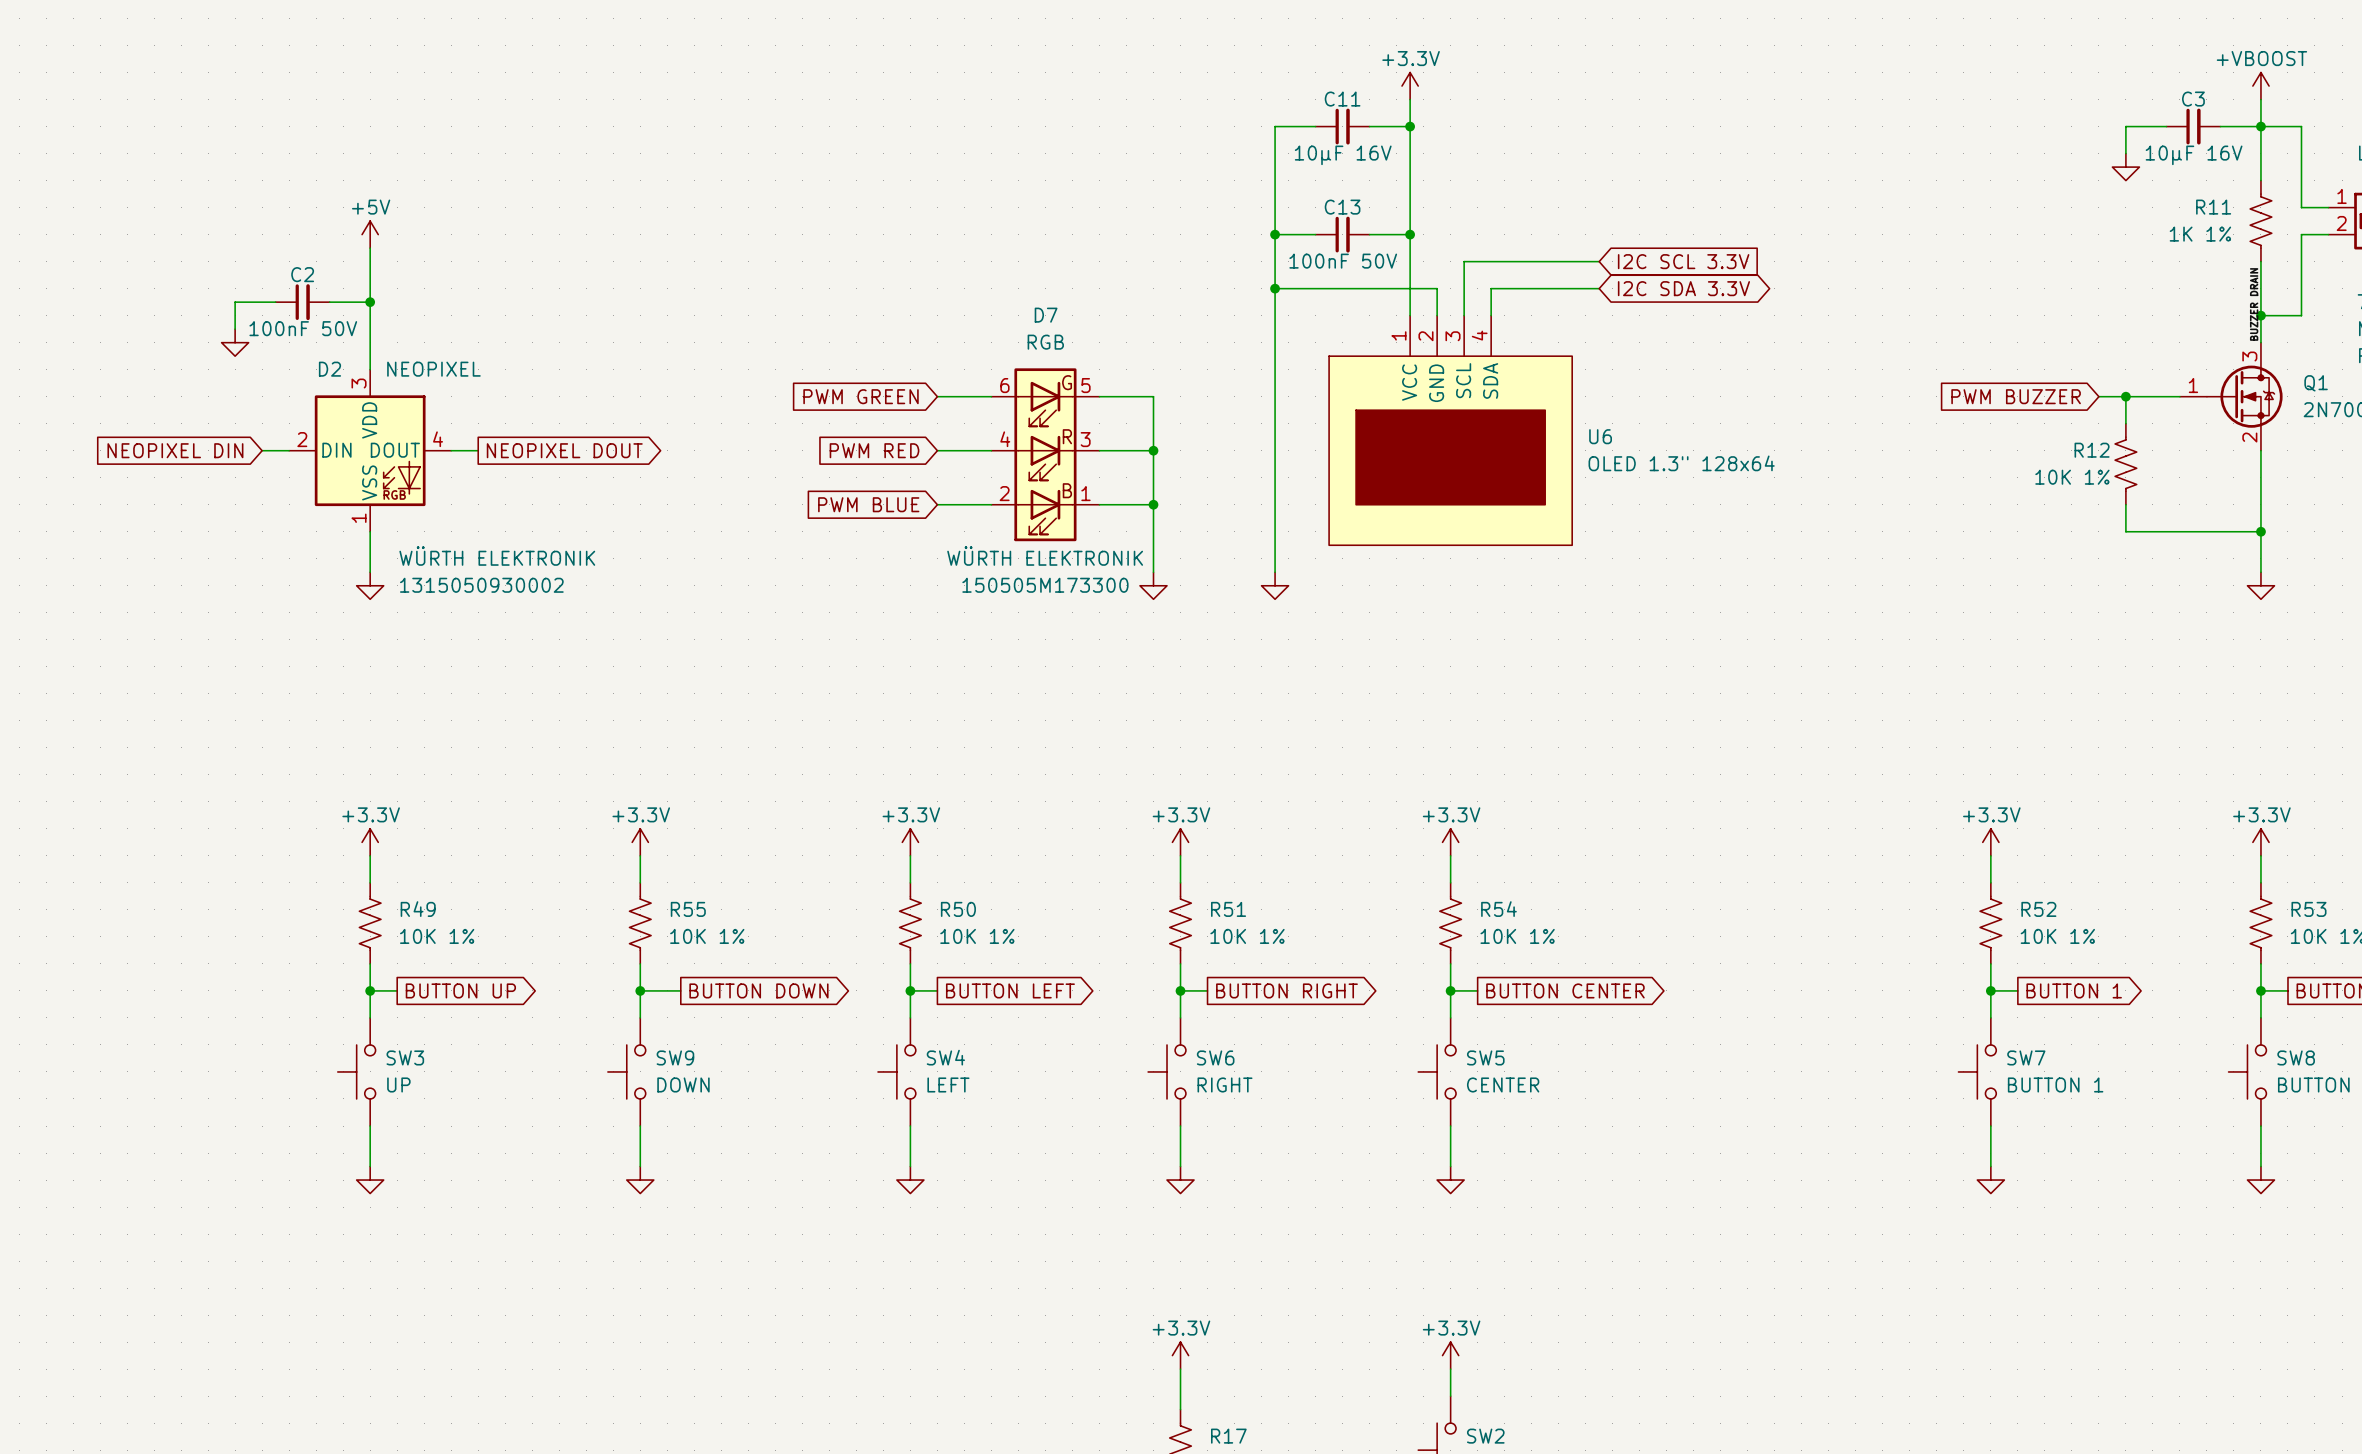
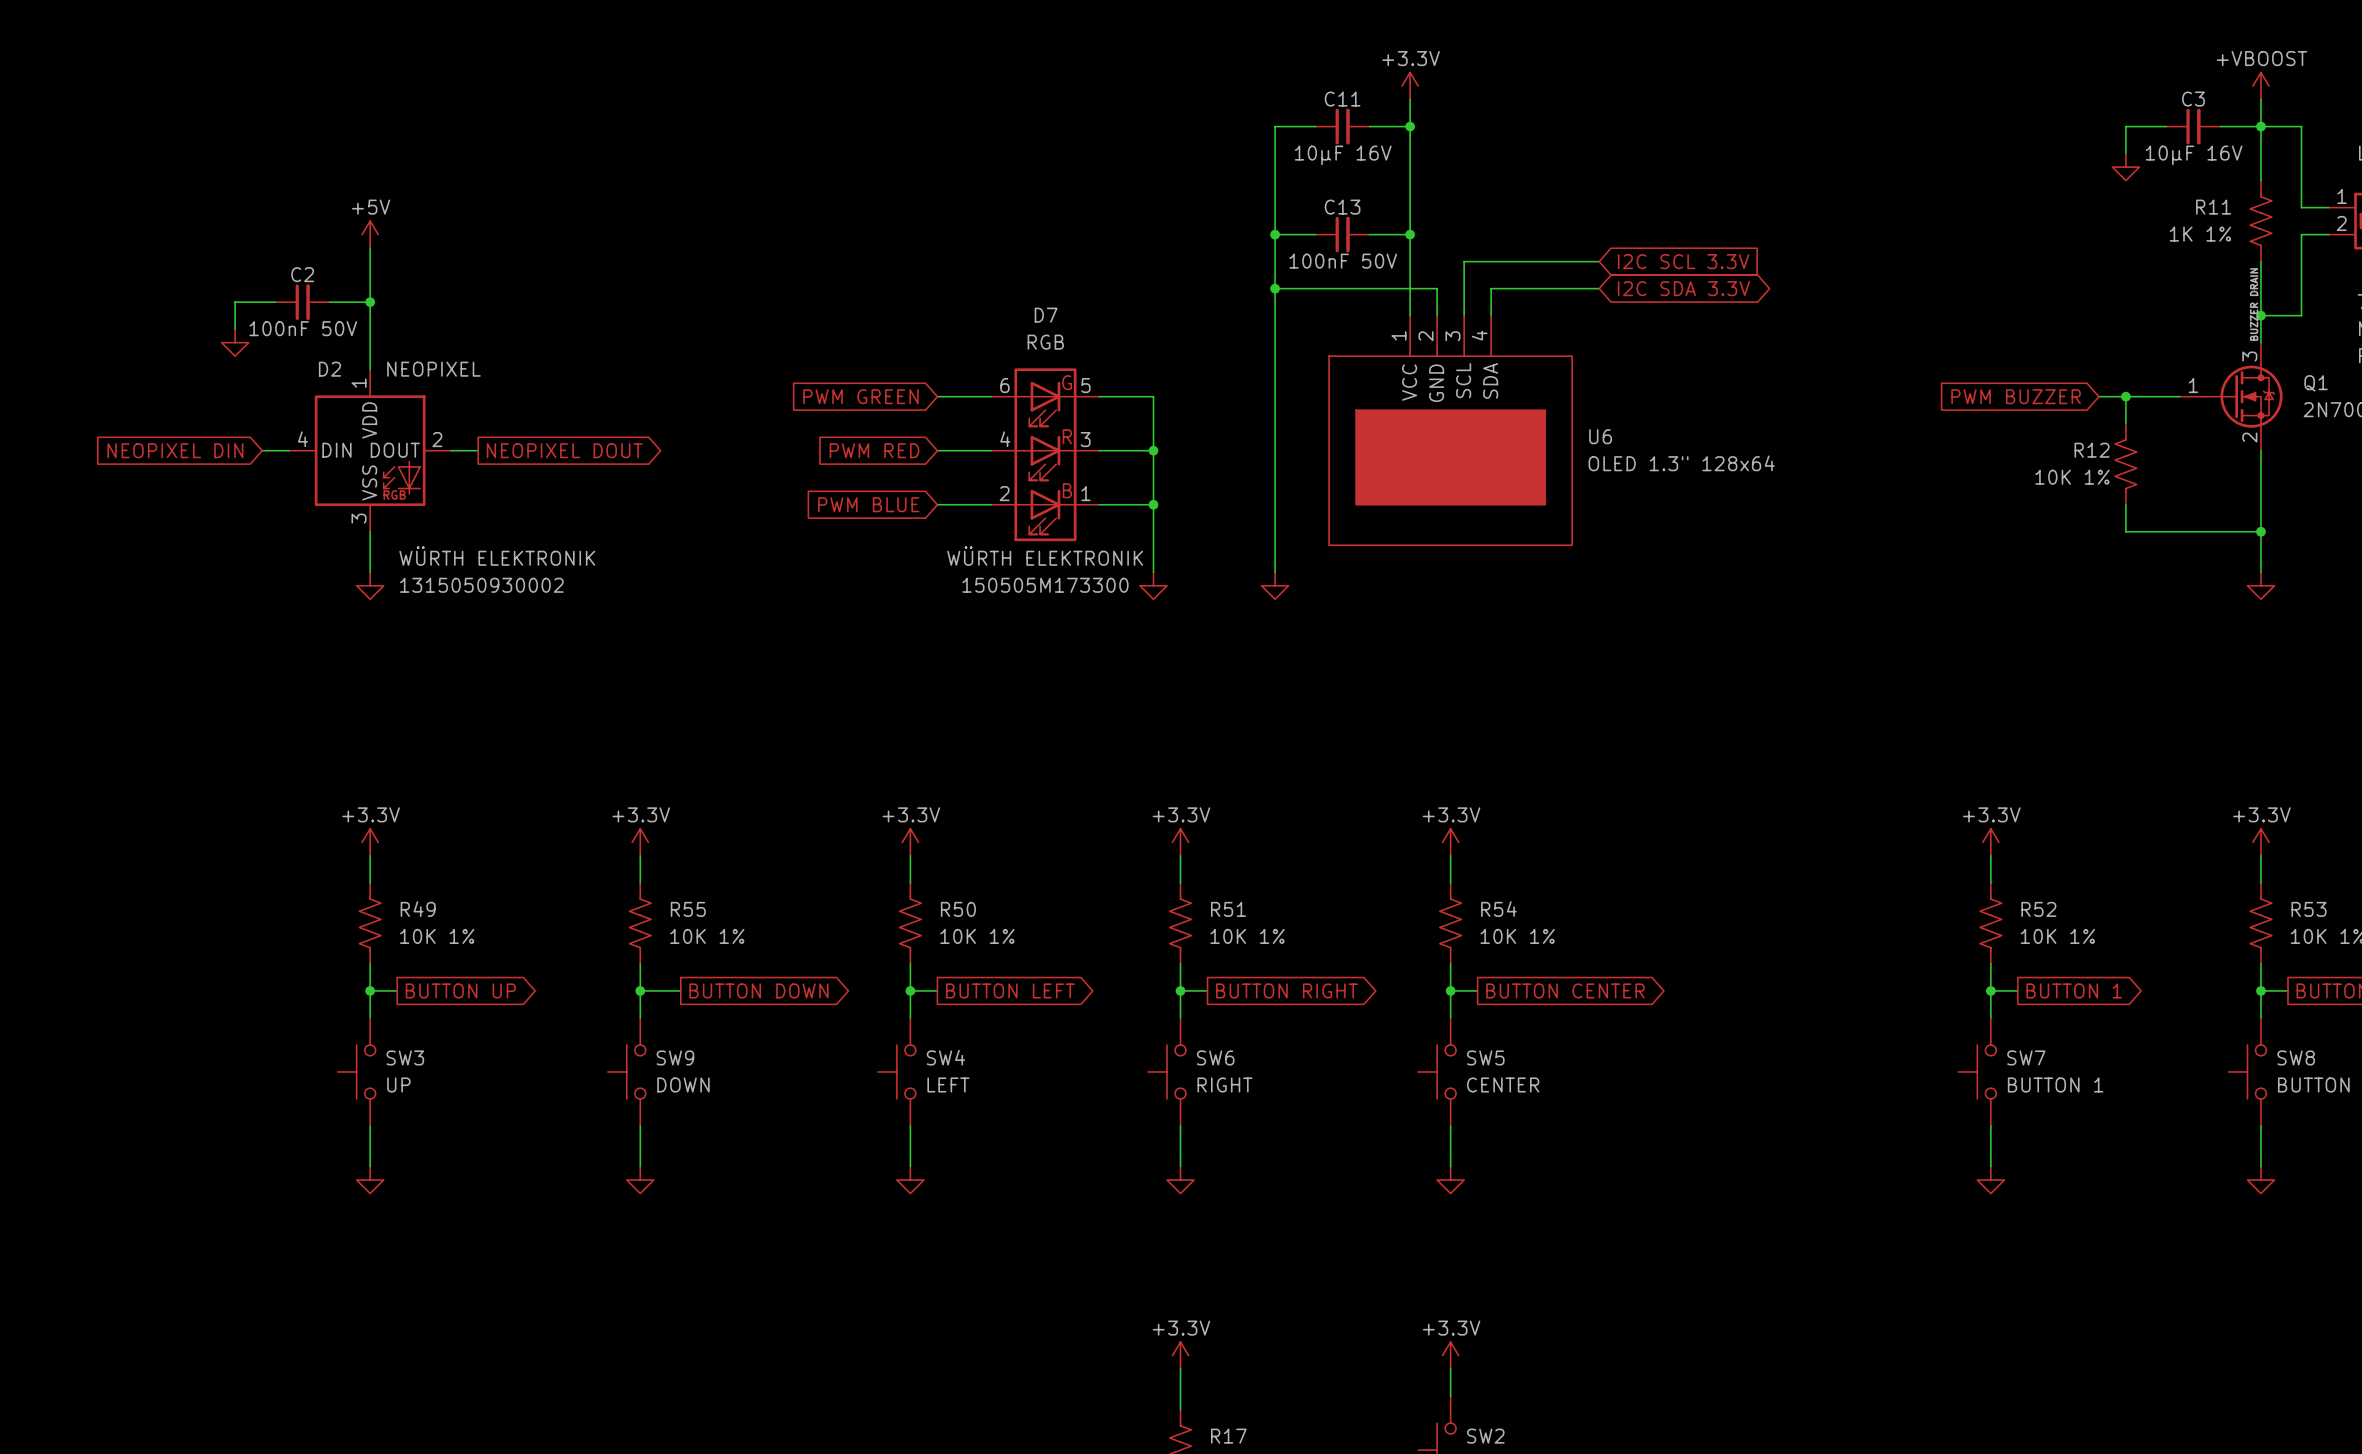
D2 pin number: 3 (359, 383) -> 1 (359, 383)
D2 pin number: 2 (302, 439) -> 4 (302, 439)
D2 pin number: 4 (438, 439) -> 2 (437, 439)
D2 pin number: 1 (359, 518) -> 3 (359, 518)

